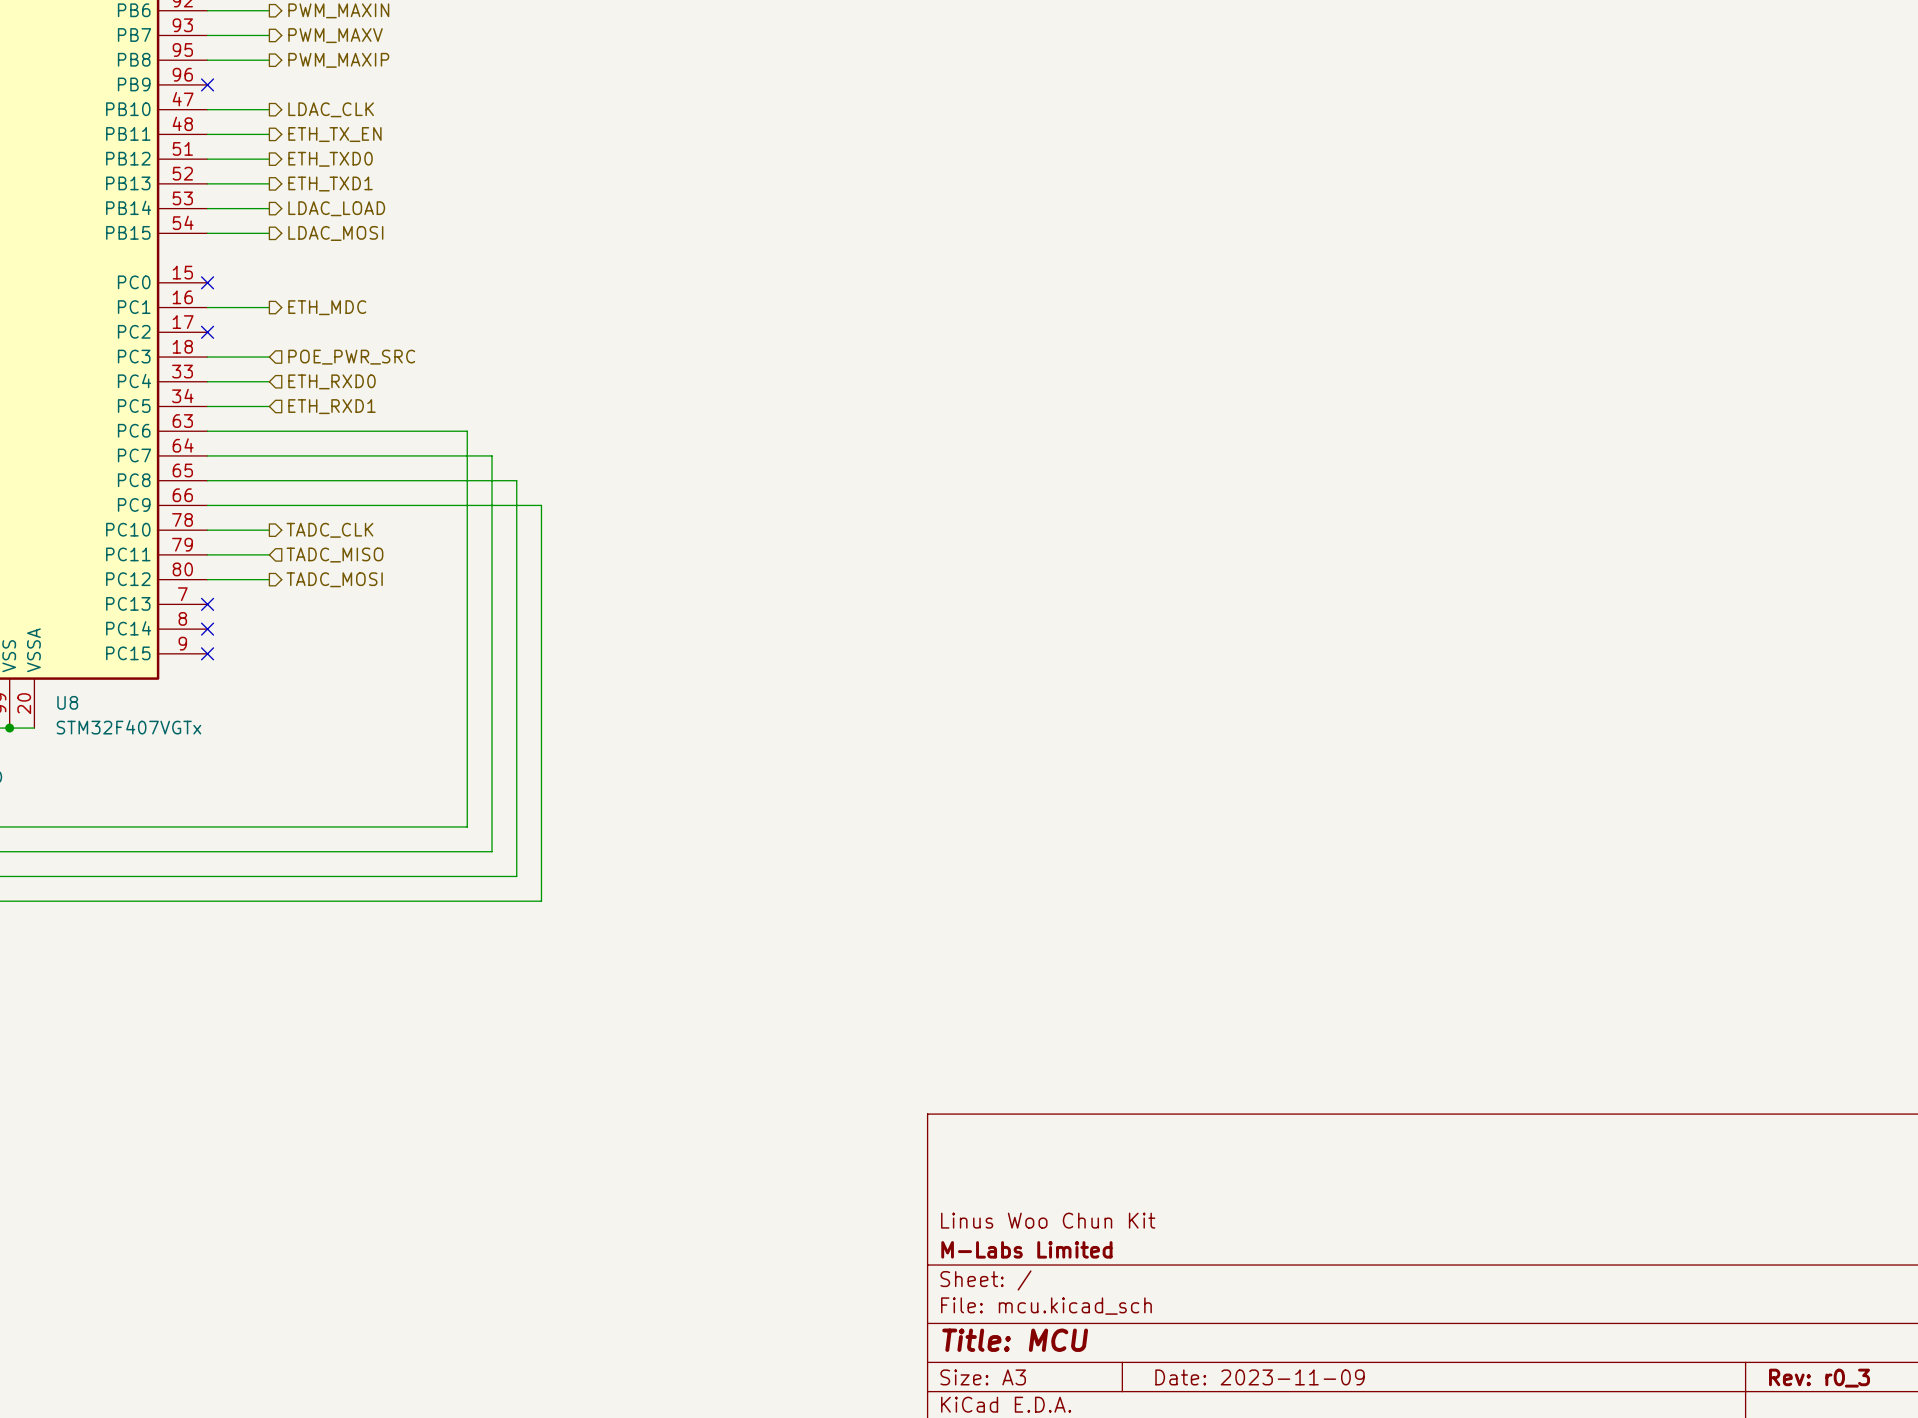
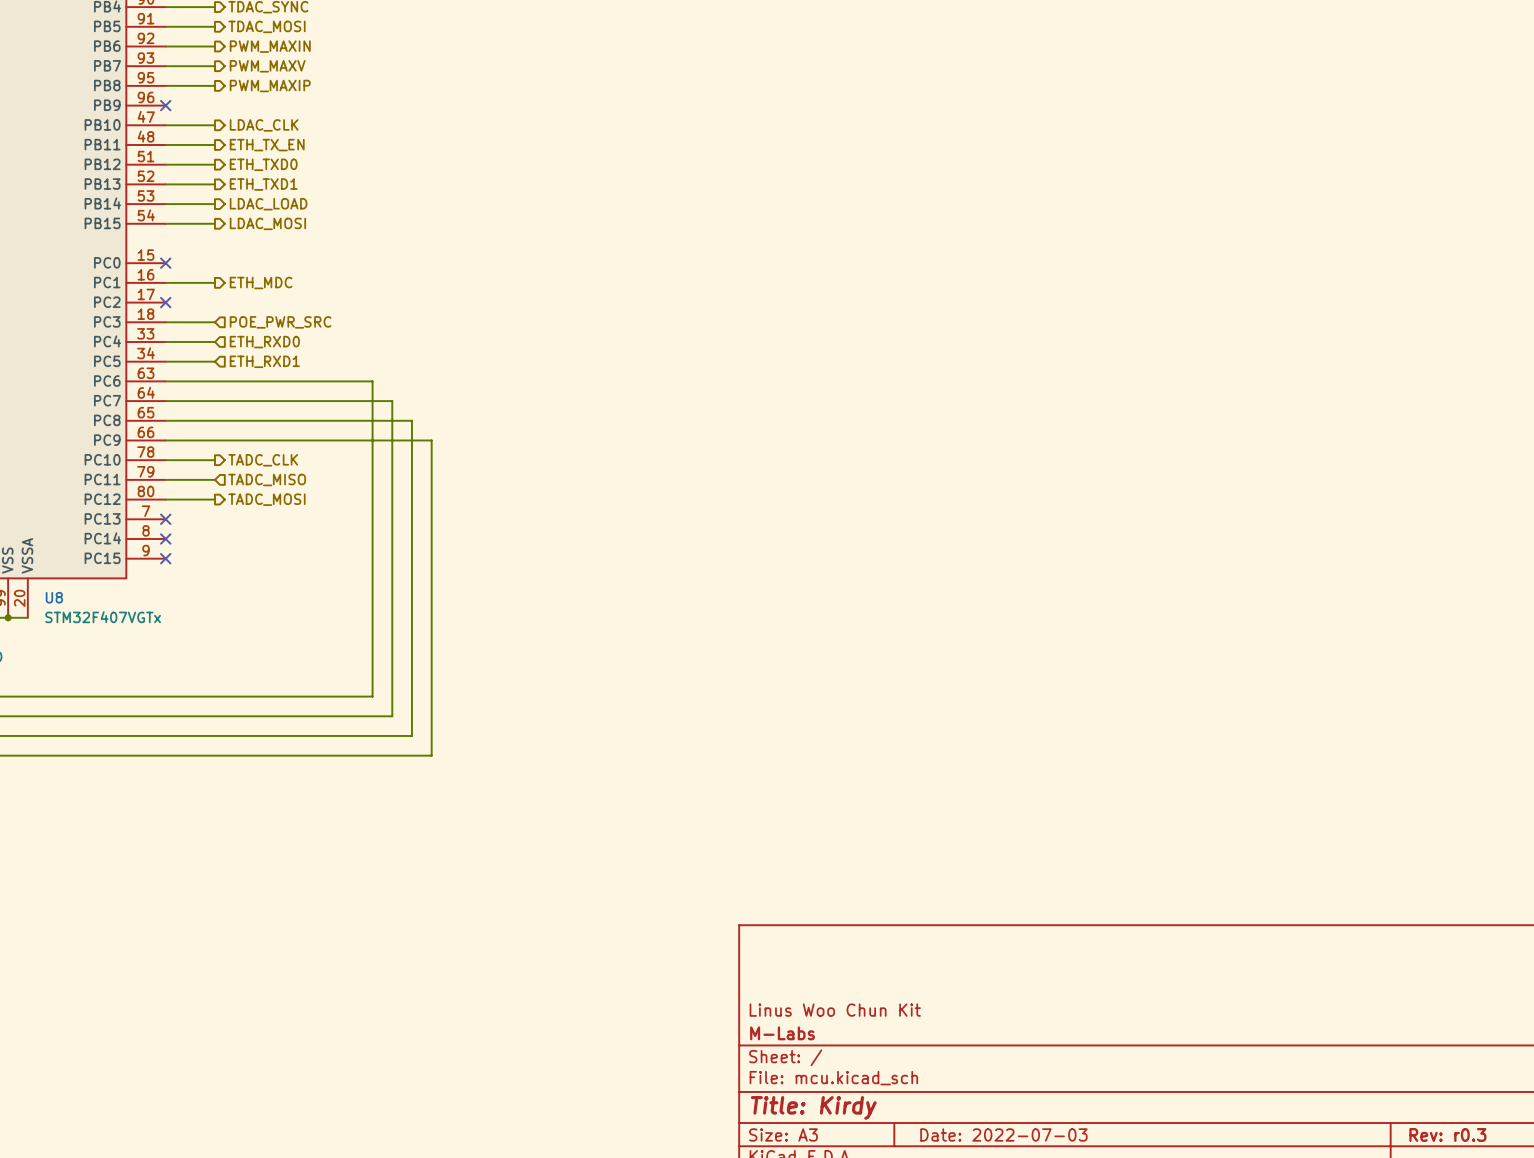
title block: M-Labs Limited (1026, 1249) -> M-Labs (782, 1033)
title block: Title: MCU (1015, 1340) -> Title: Kirdy (813, 1107)
title block: Date: 2023-11-09 (1260, 1377) -> Date: 2022-07-03 (1003, 1134)
title block: Rev: r0_3 (1819, 1378) -> Rev: r0.3 (1447, 1134)

